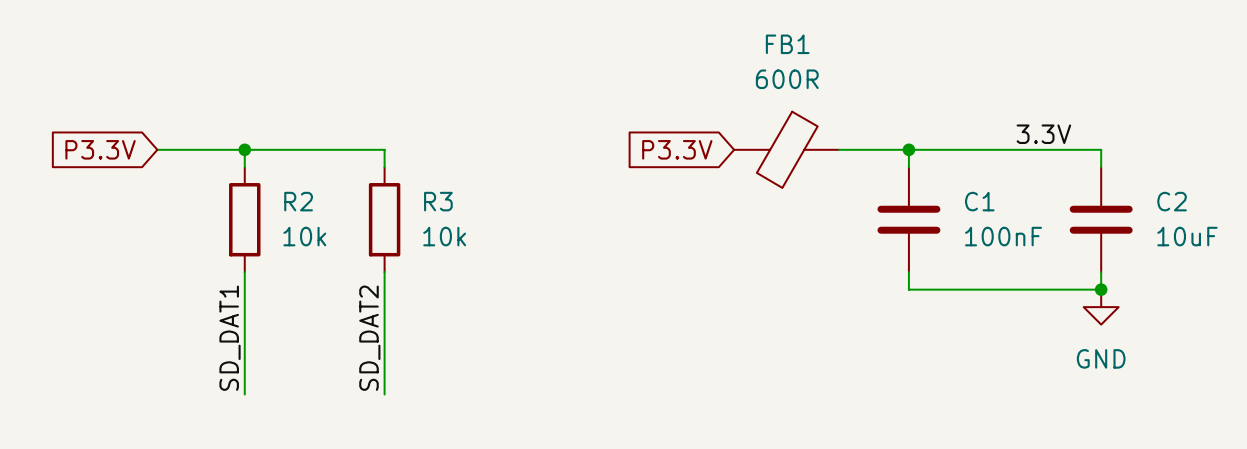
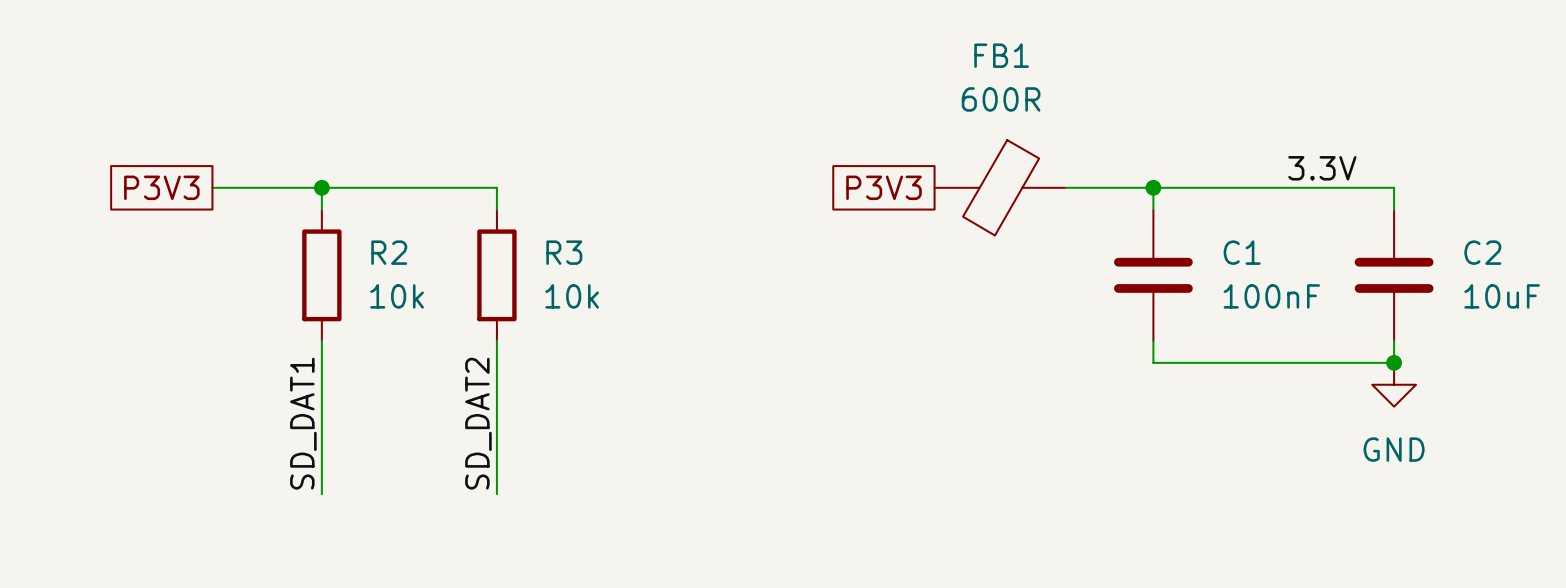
global label shape: input (100, 149) -> passive (161, 187)
global label: P3.3V (100, 149) -> P3V3 (161, 187)
global label shape: input (677, 149) -> passive (884, 187)
global label: P3.3V (677, 149) -> P3V3 (884, 187)

